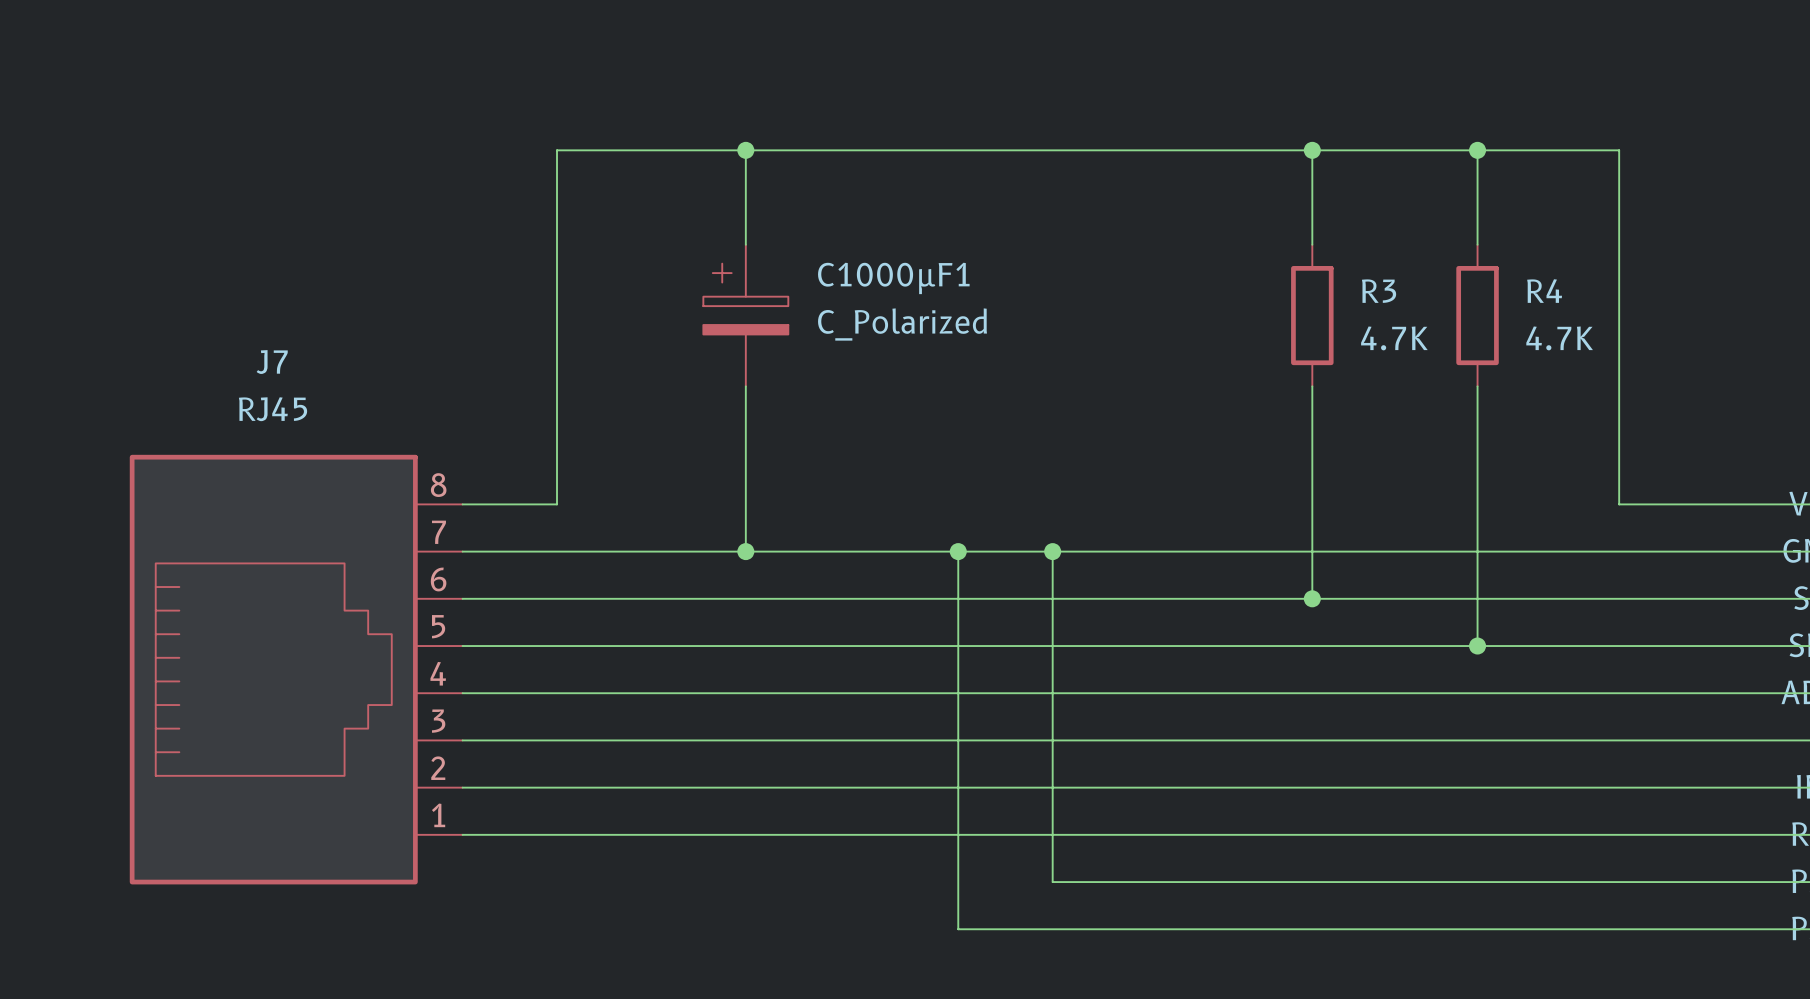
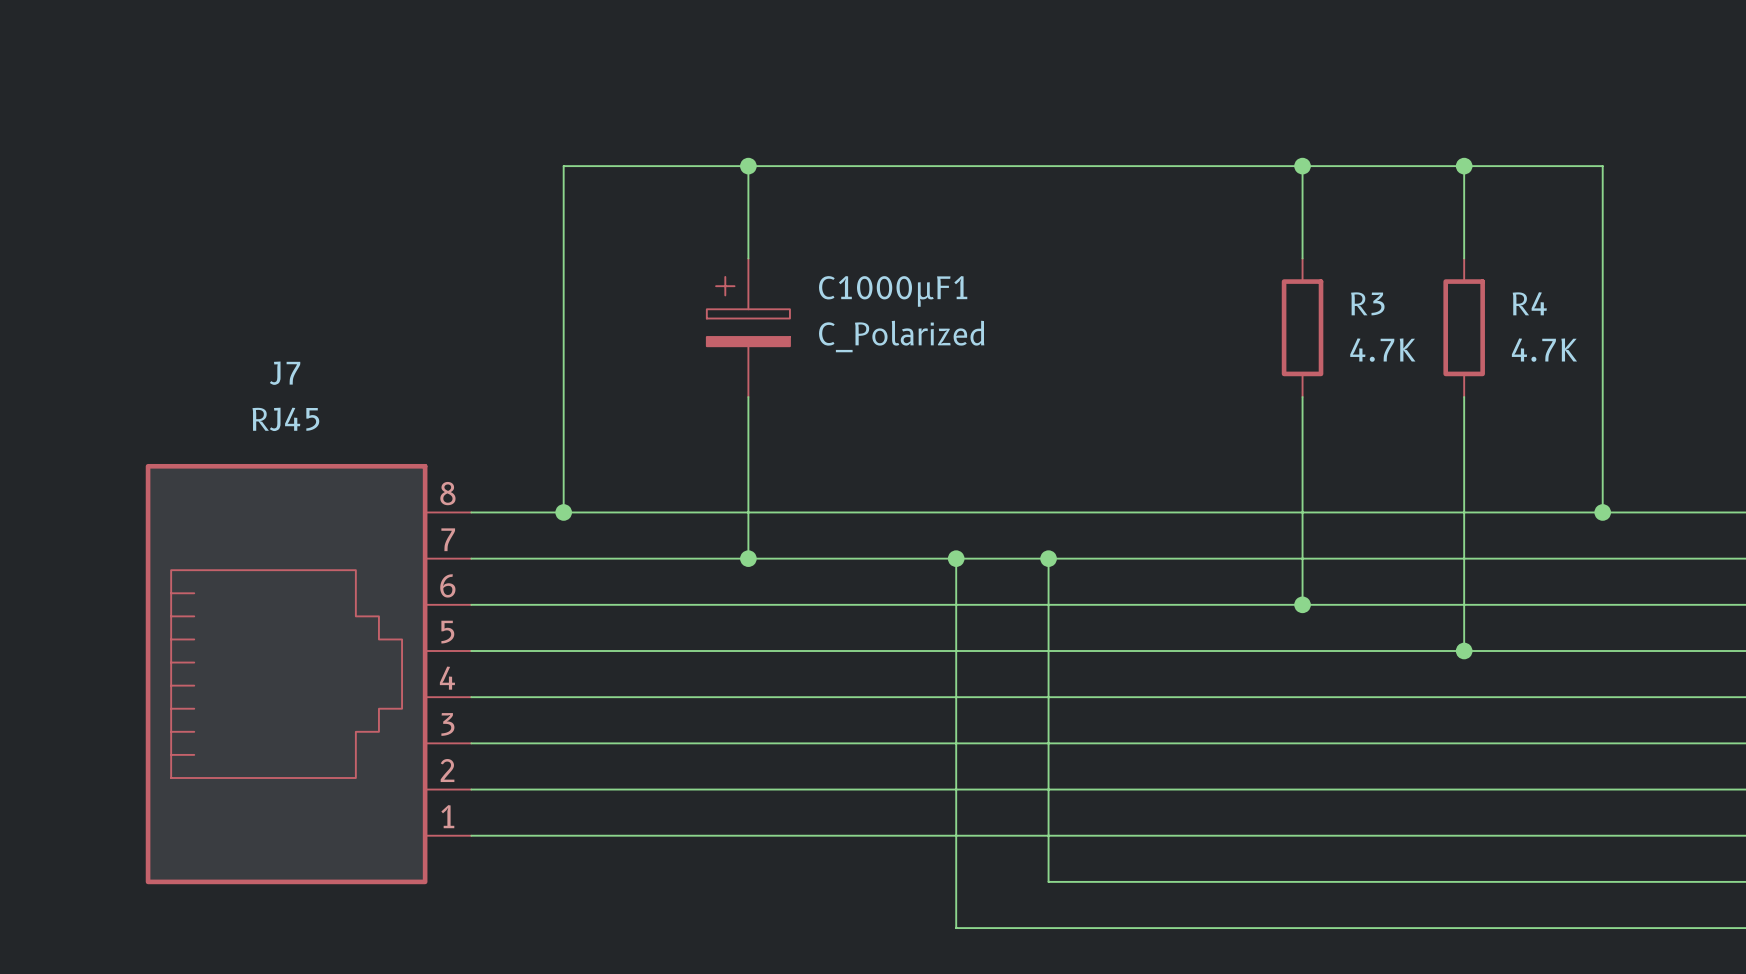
wire: none -> (563, 512) (1602, 512)
junction: none -> (563, 512)
junction: none -> (1602, 512)

